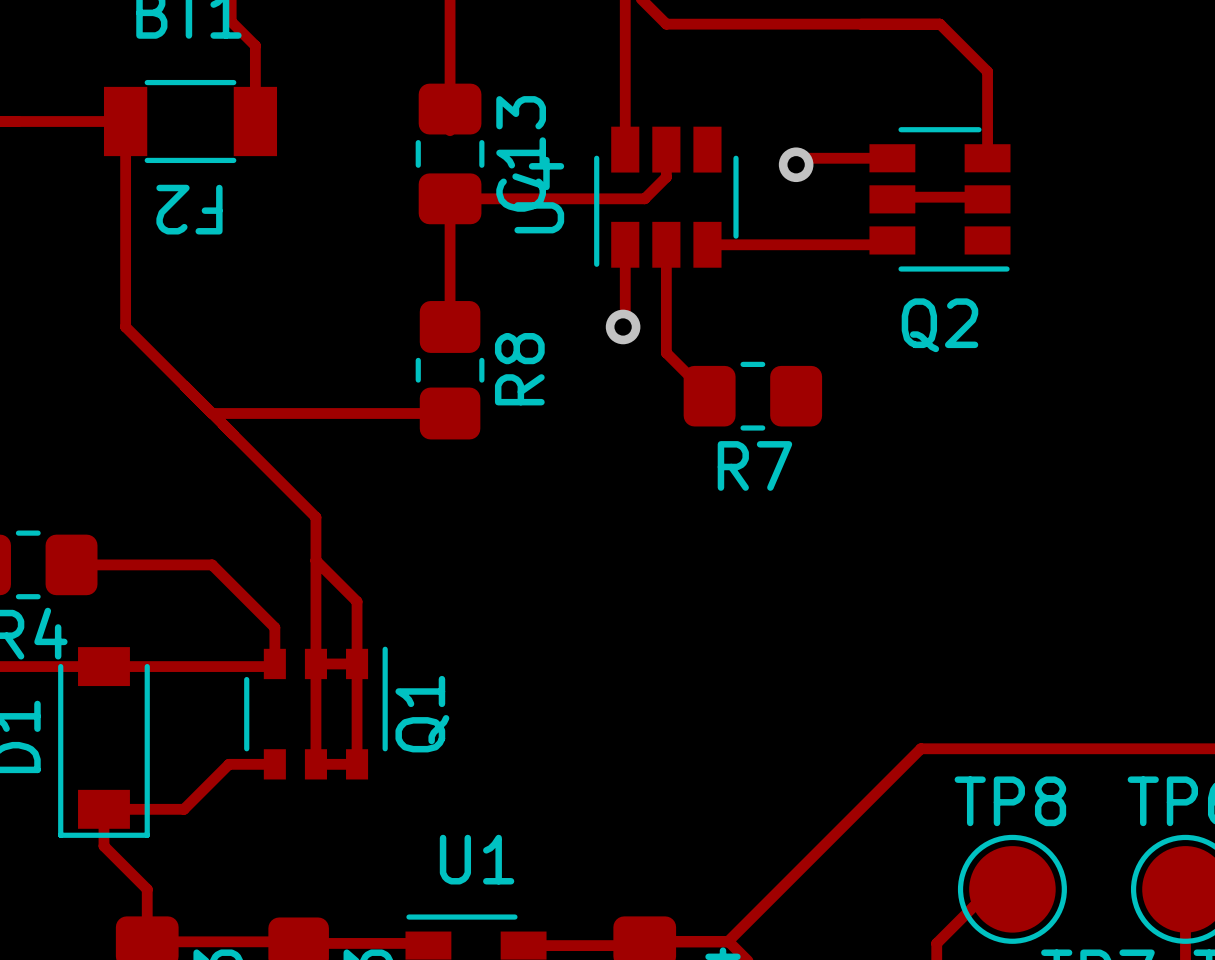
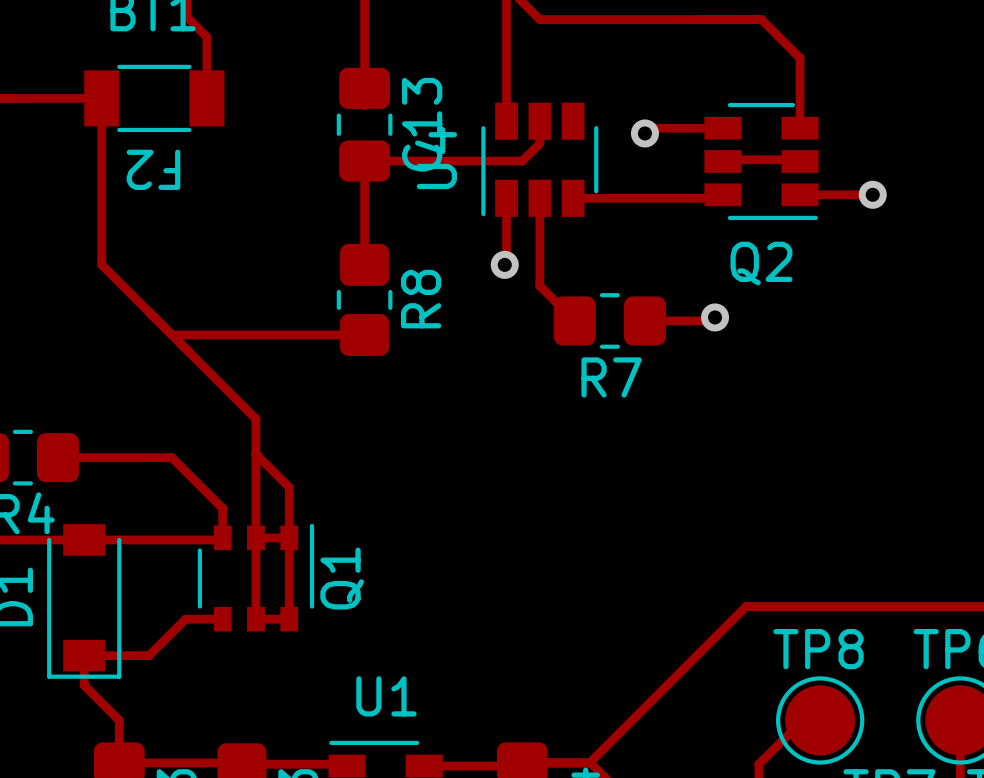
track: none -> (800, 194) (872, 194)
via: none -> (872, 194)
track: none -> (715, 317) (711, 320) (644, 320)
via: none -> (715, 317)

